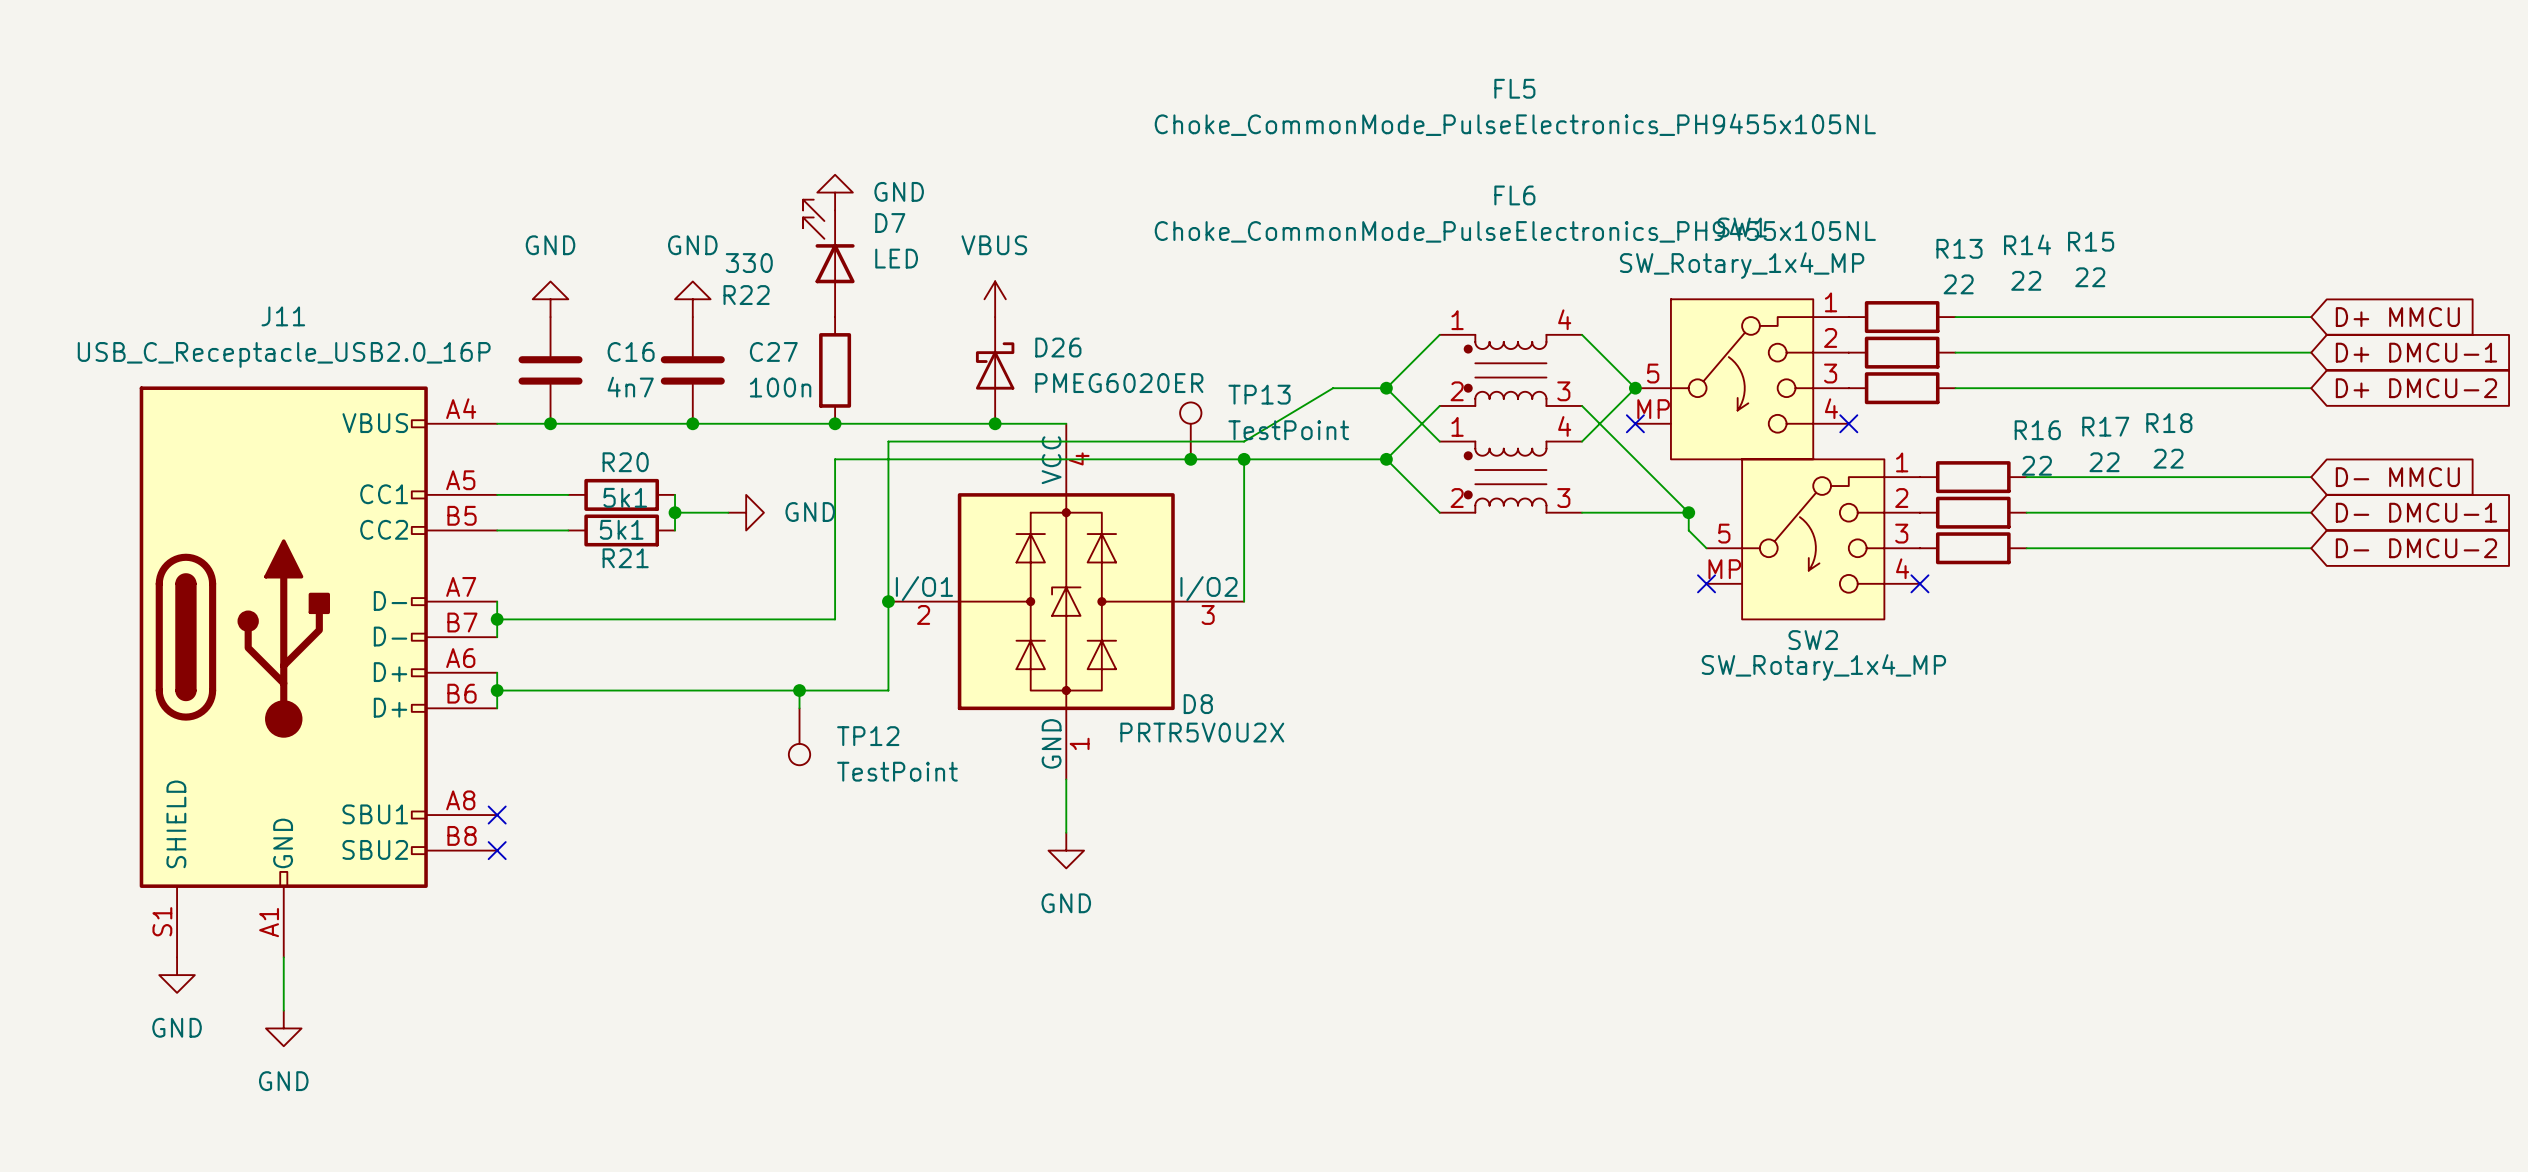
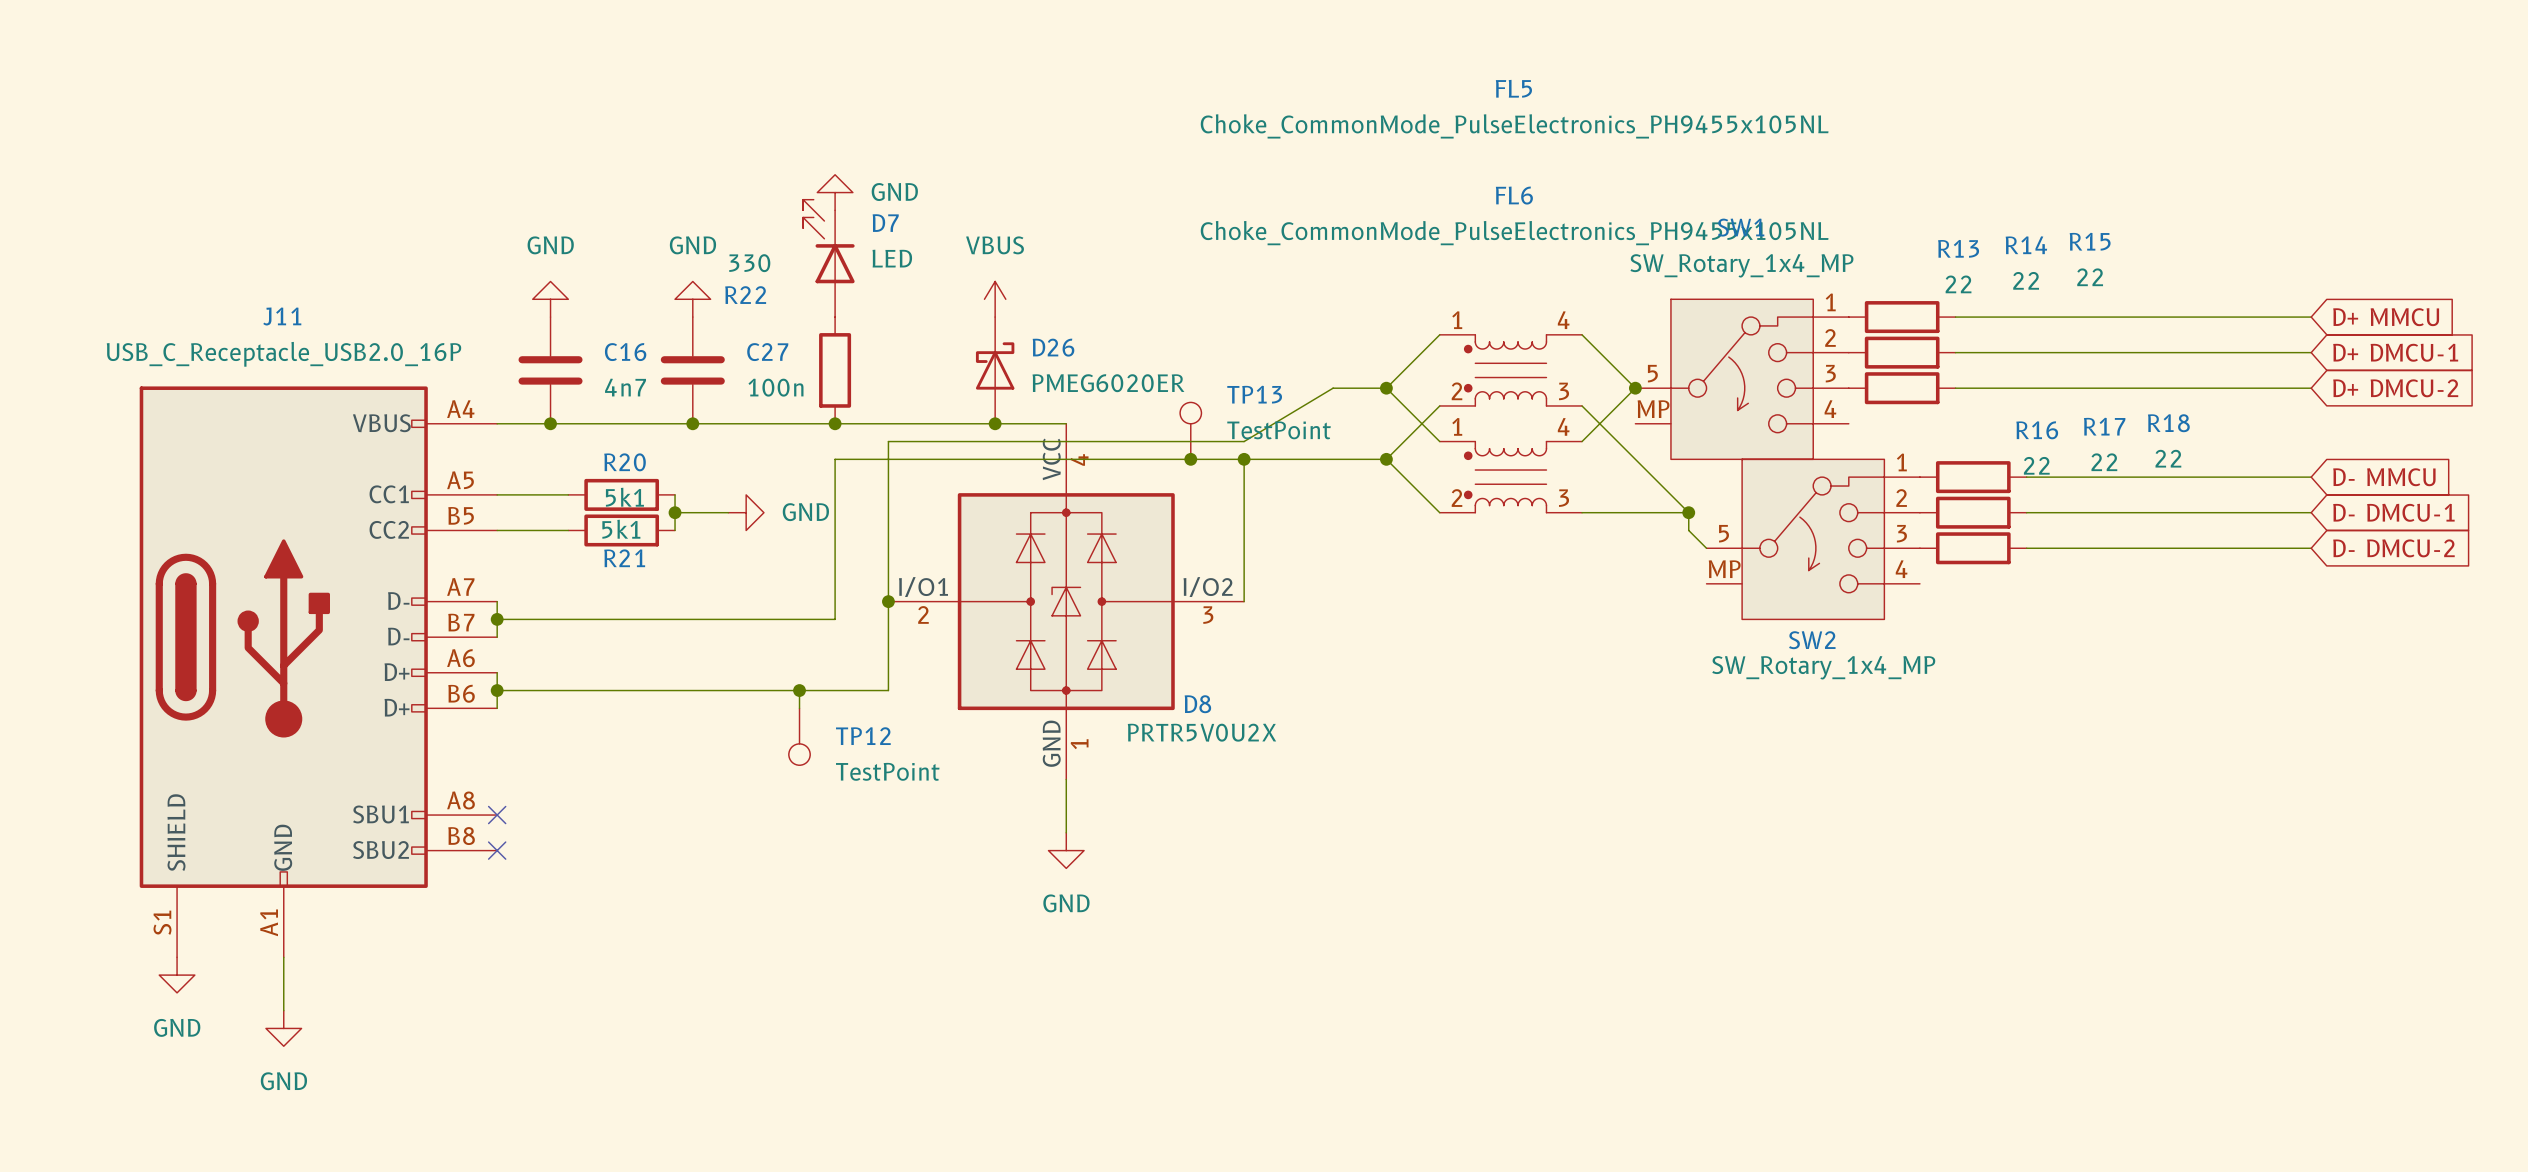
no-connect mark: (1635, 423) -> none
no-connect mark: (1848, 423) -> none
no-connect mark: (1706, 583) -> none
no-connect mark: (1919, 583) -> none

